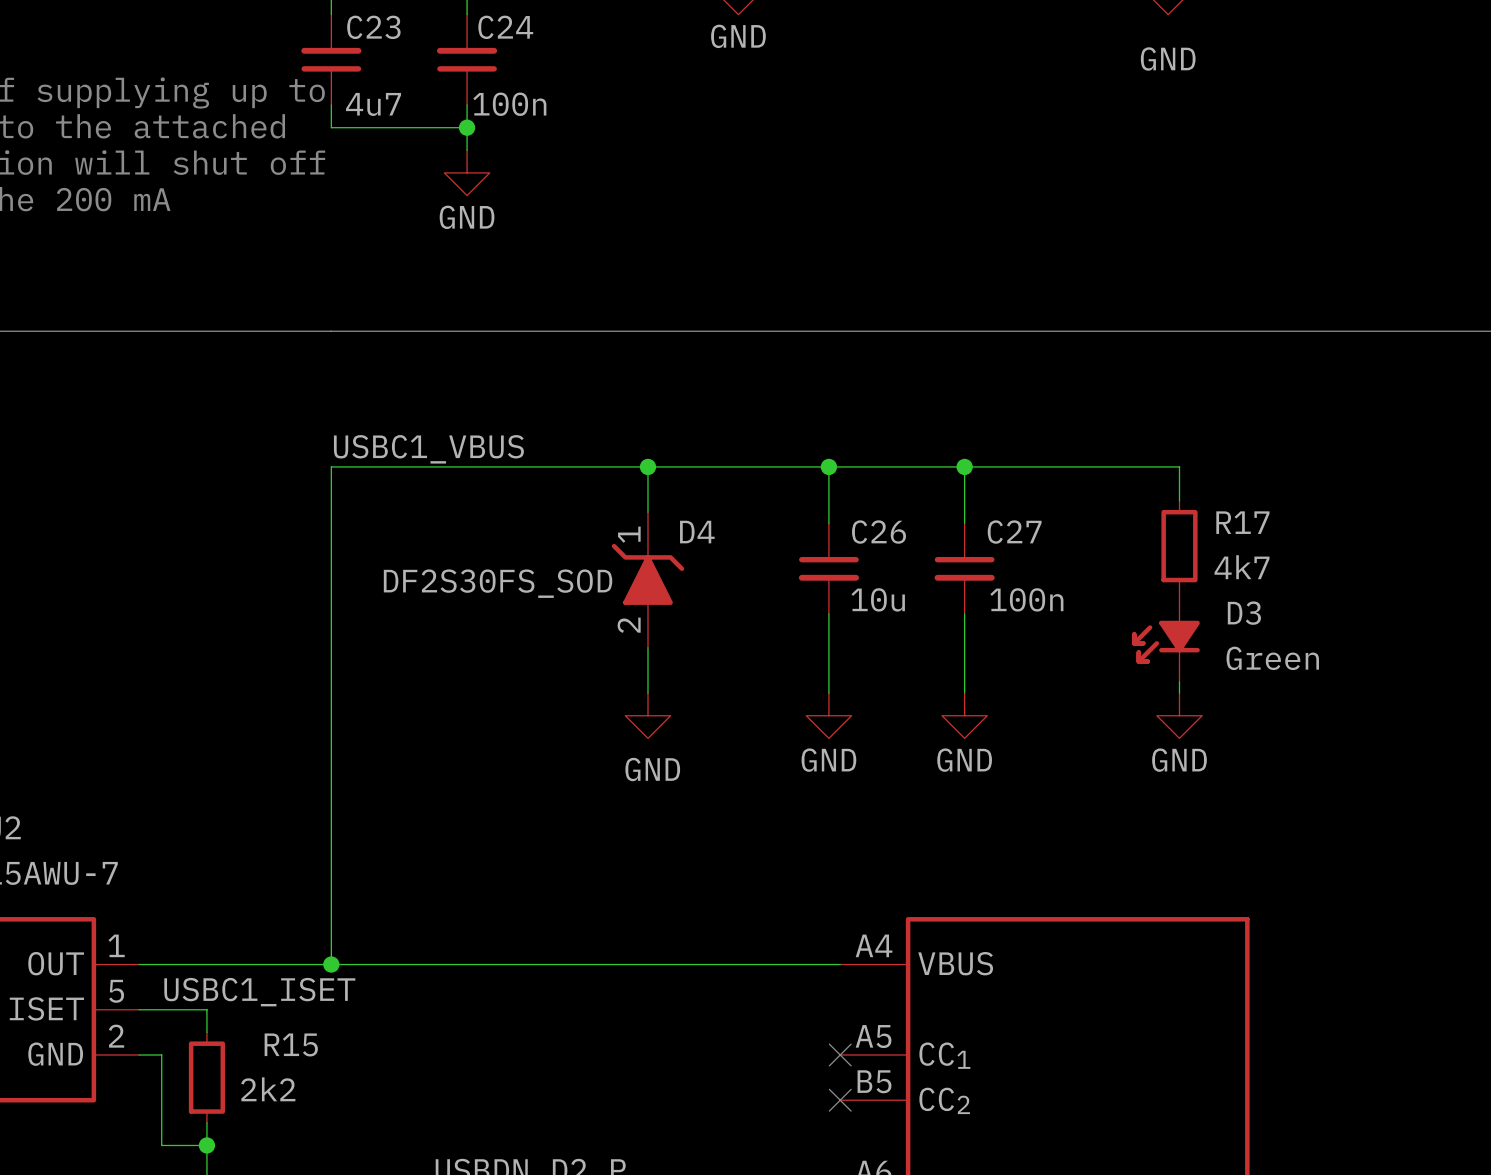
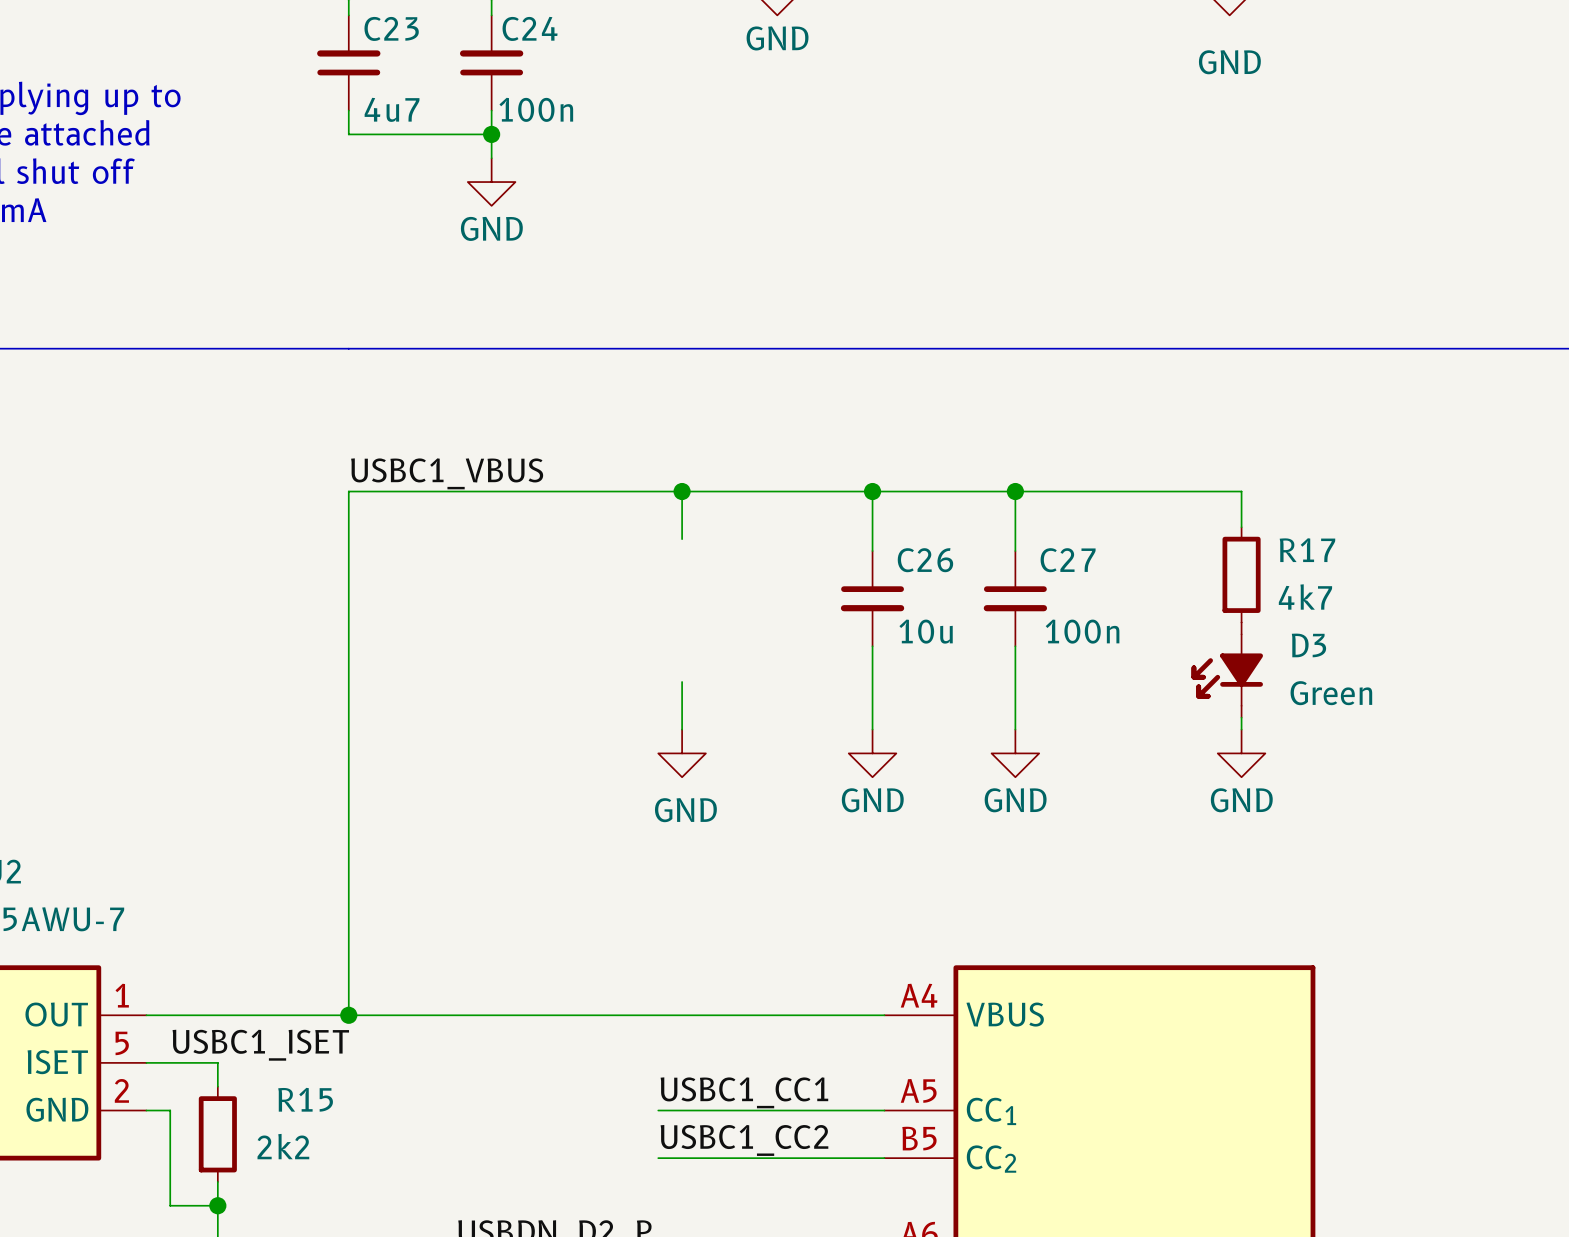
D4: DF2S30FS_SOD (647, 580) -> none
label: none -> USBC1_CC1 (744, 1092)
wire: none -> (658, 1110) (884, 1110)
no-connect mark: (840, 1055) -> none
label: none -> USBC1_CC2 (744, 1140)
wire: none -> (658, 1158) (884, 1158)
no-connect mark: (840, 1100) -> none

